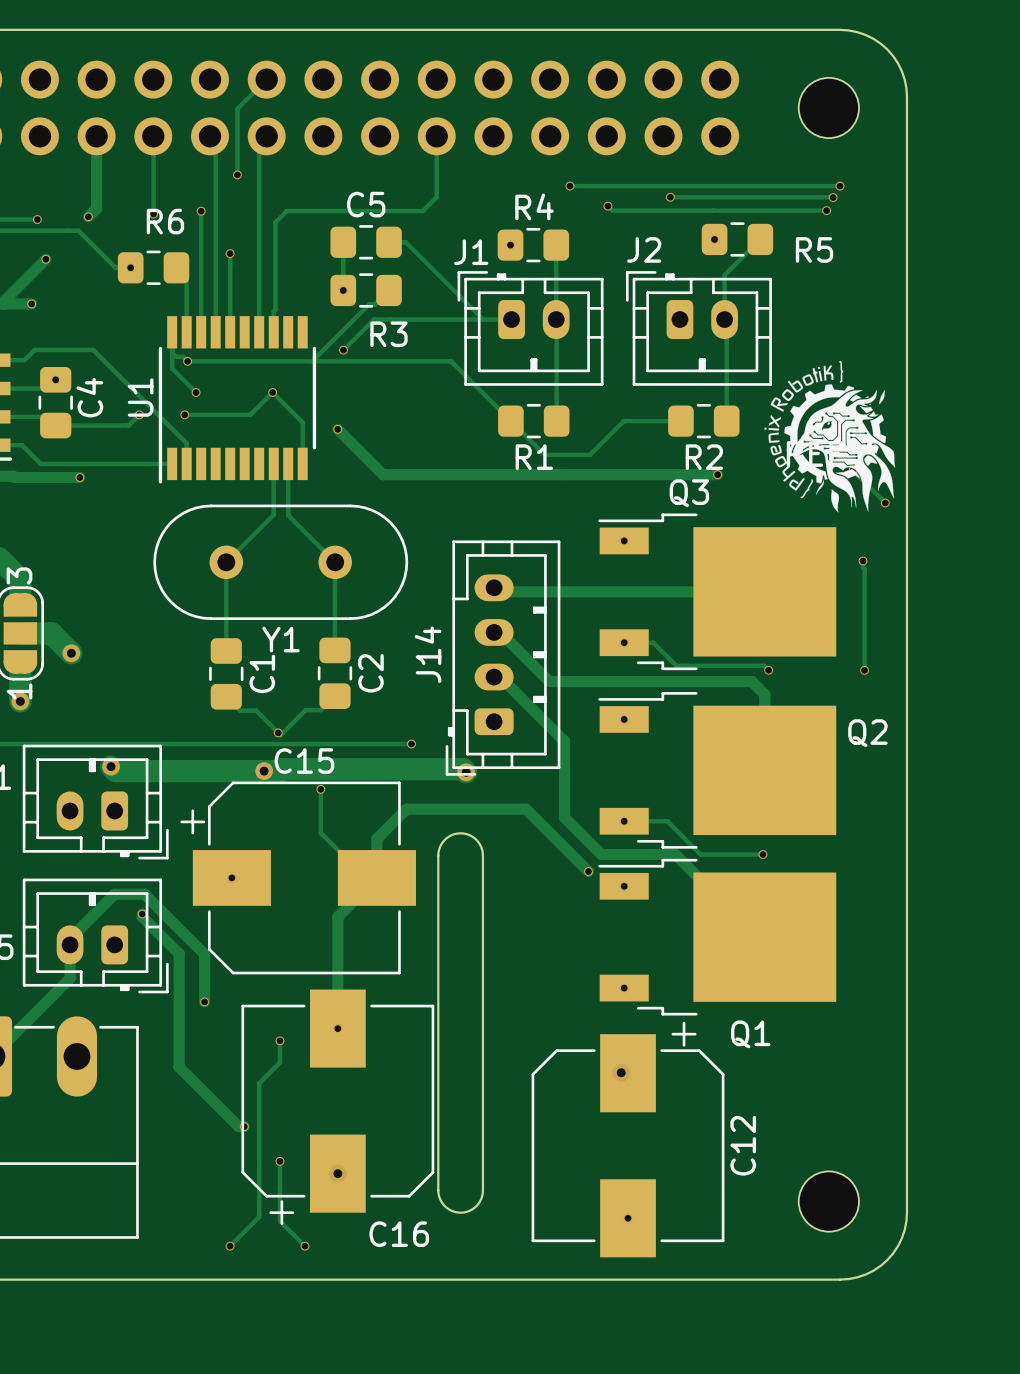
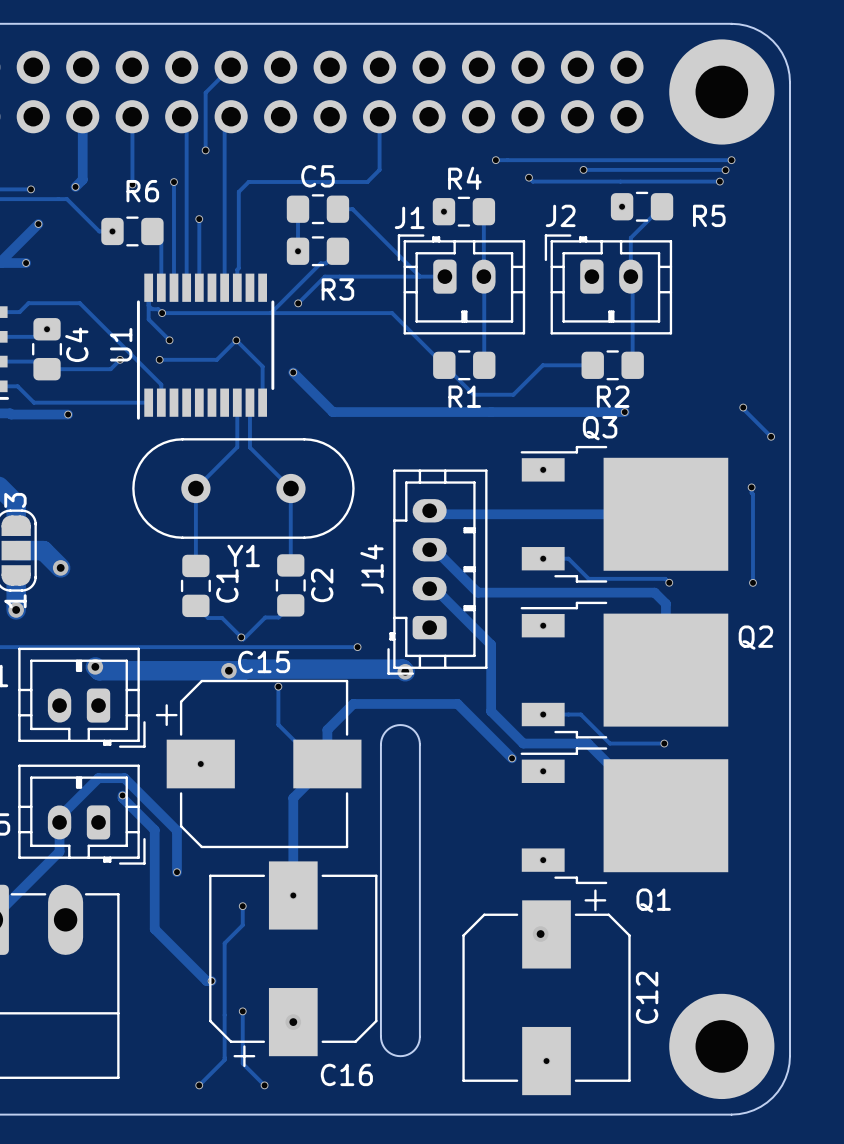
part footprint: [798, 77, 859, 139] -> [669, 39, 775, 145]
part: (829, 436) -> none
part footprint: [798, 1171, 859, 1232] -> [669, 993, 775, 1100]

